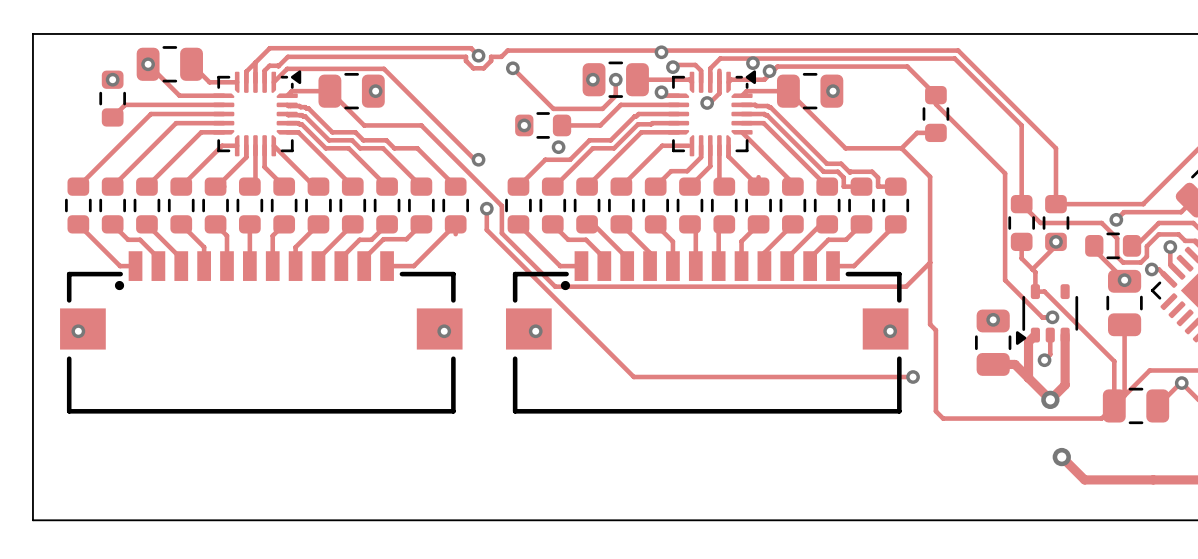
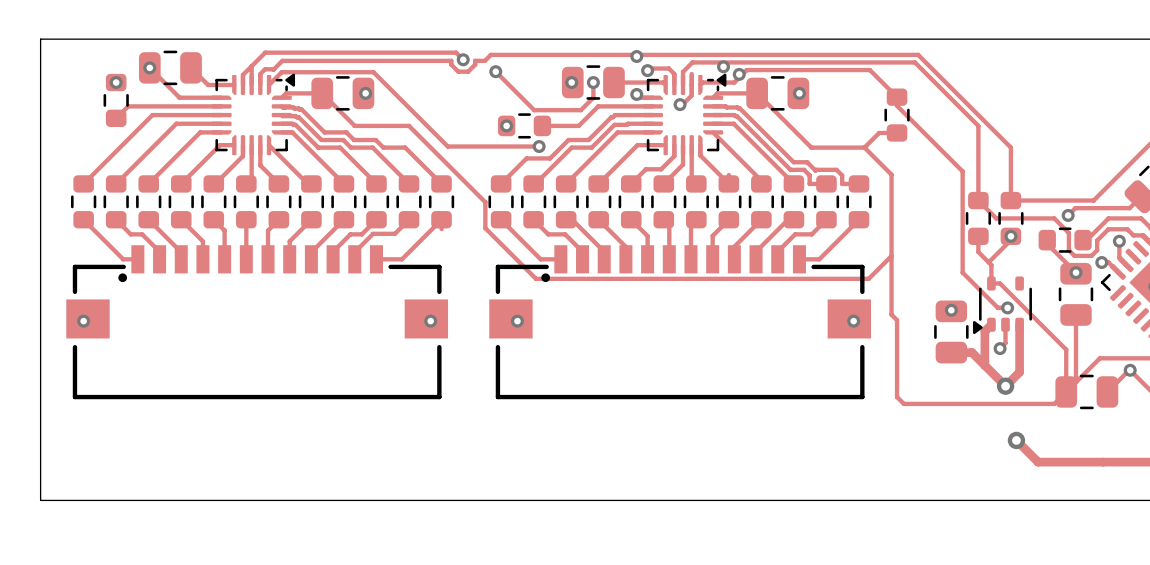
track: (462, 147) (474, 159) (478, 159) -> (447, 146) (539, 146)
via: (478, 159) -> none
track: (486, 208) (486, 229) (633, 377) (913, 377) -> none
via: (486, 208) -> none
via: (913, 377) -> none

